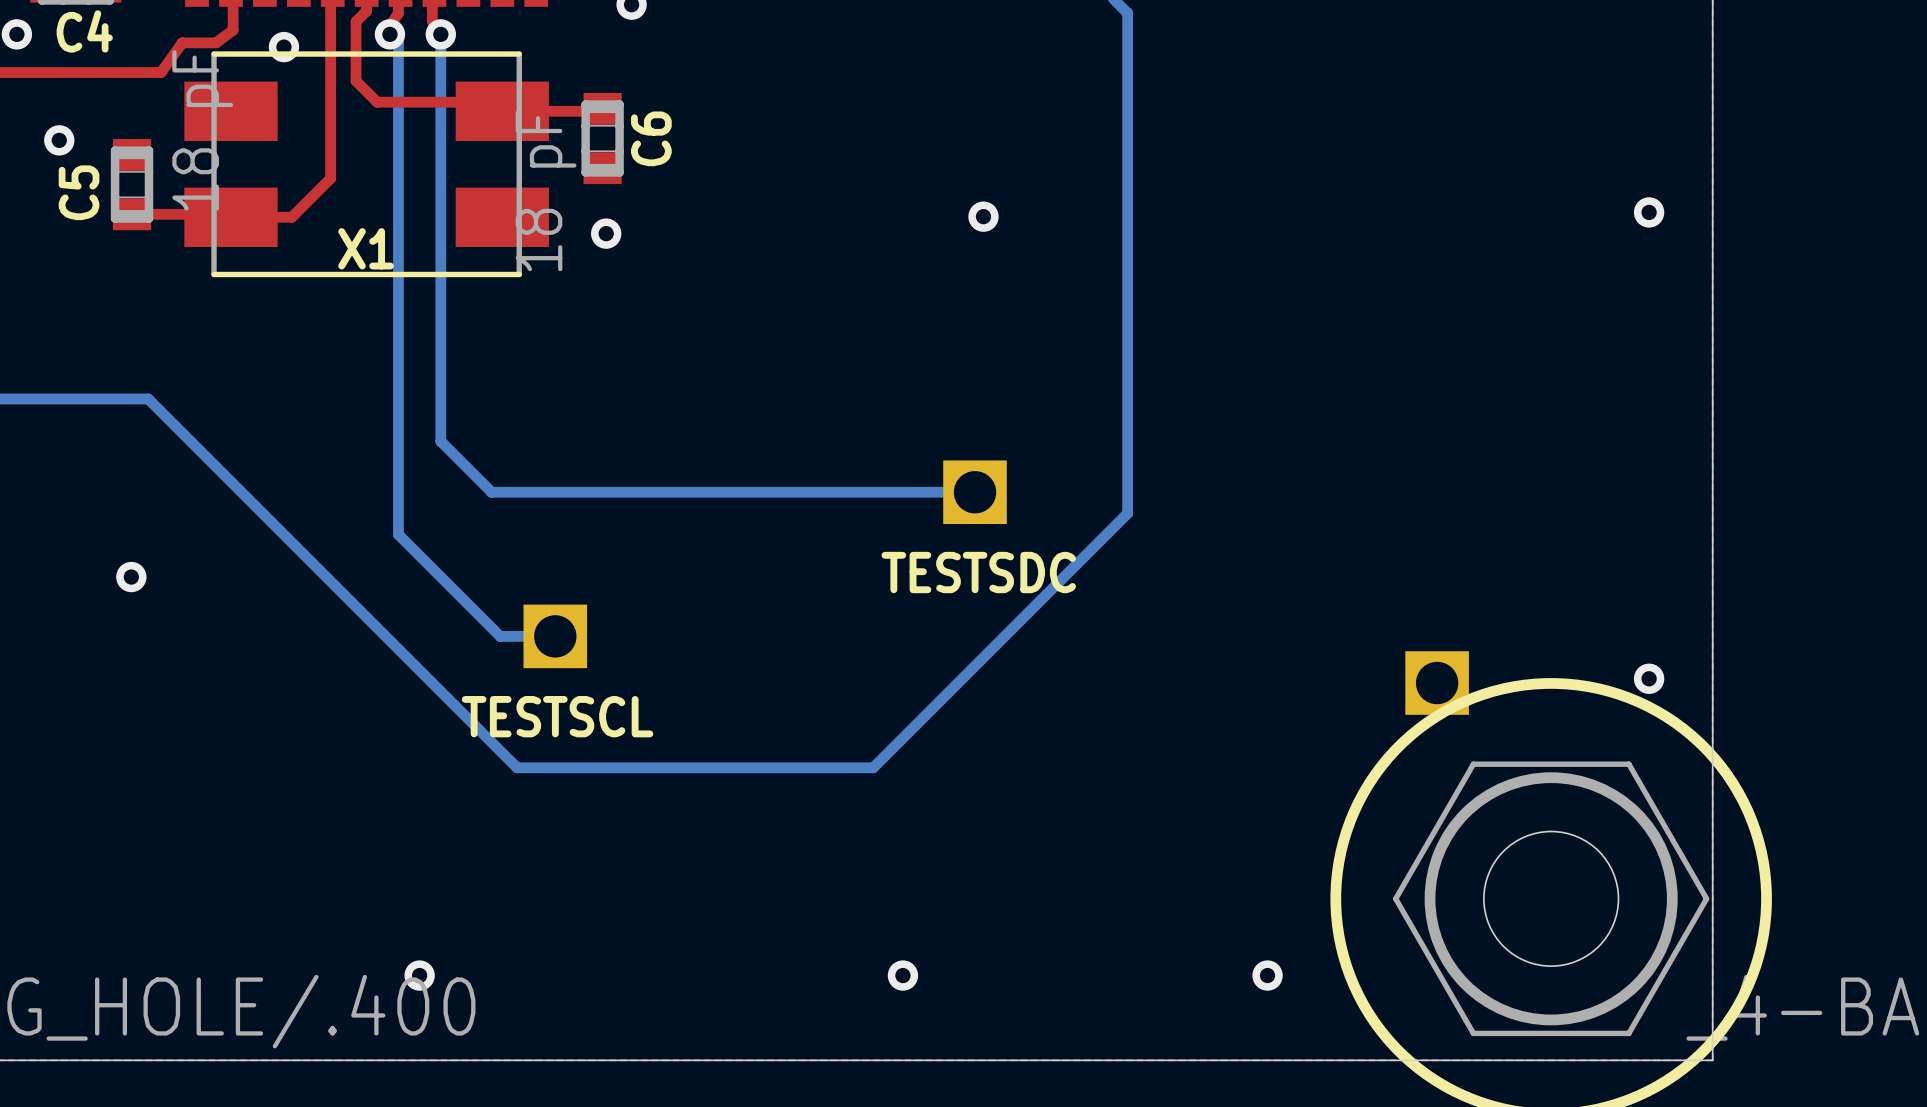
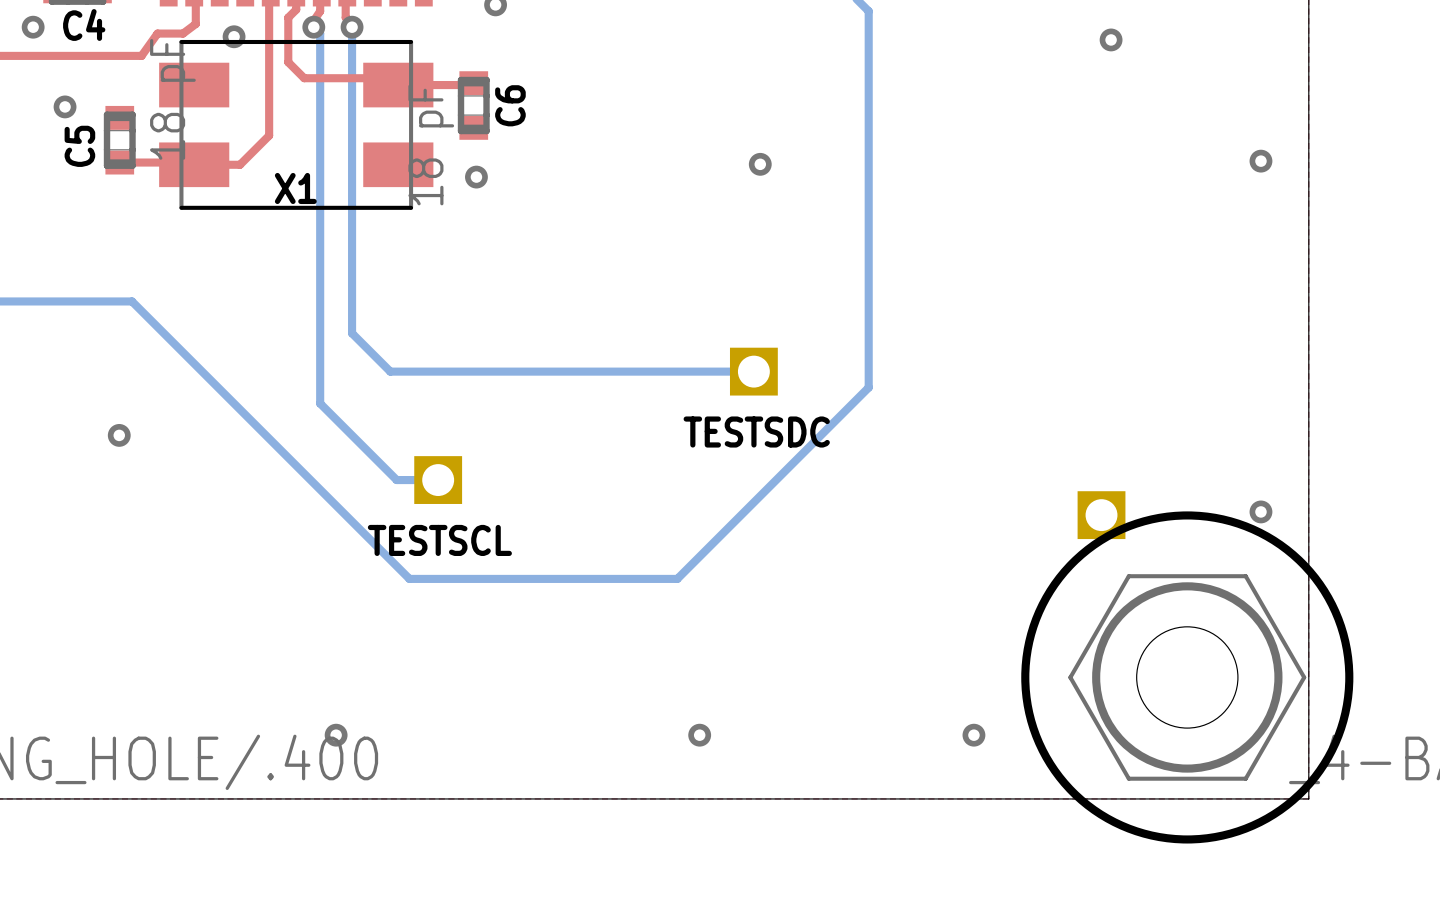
via: none -> (1111, 39)

